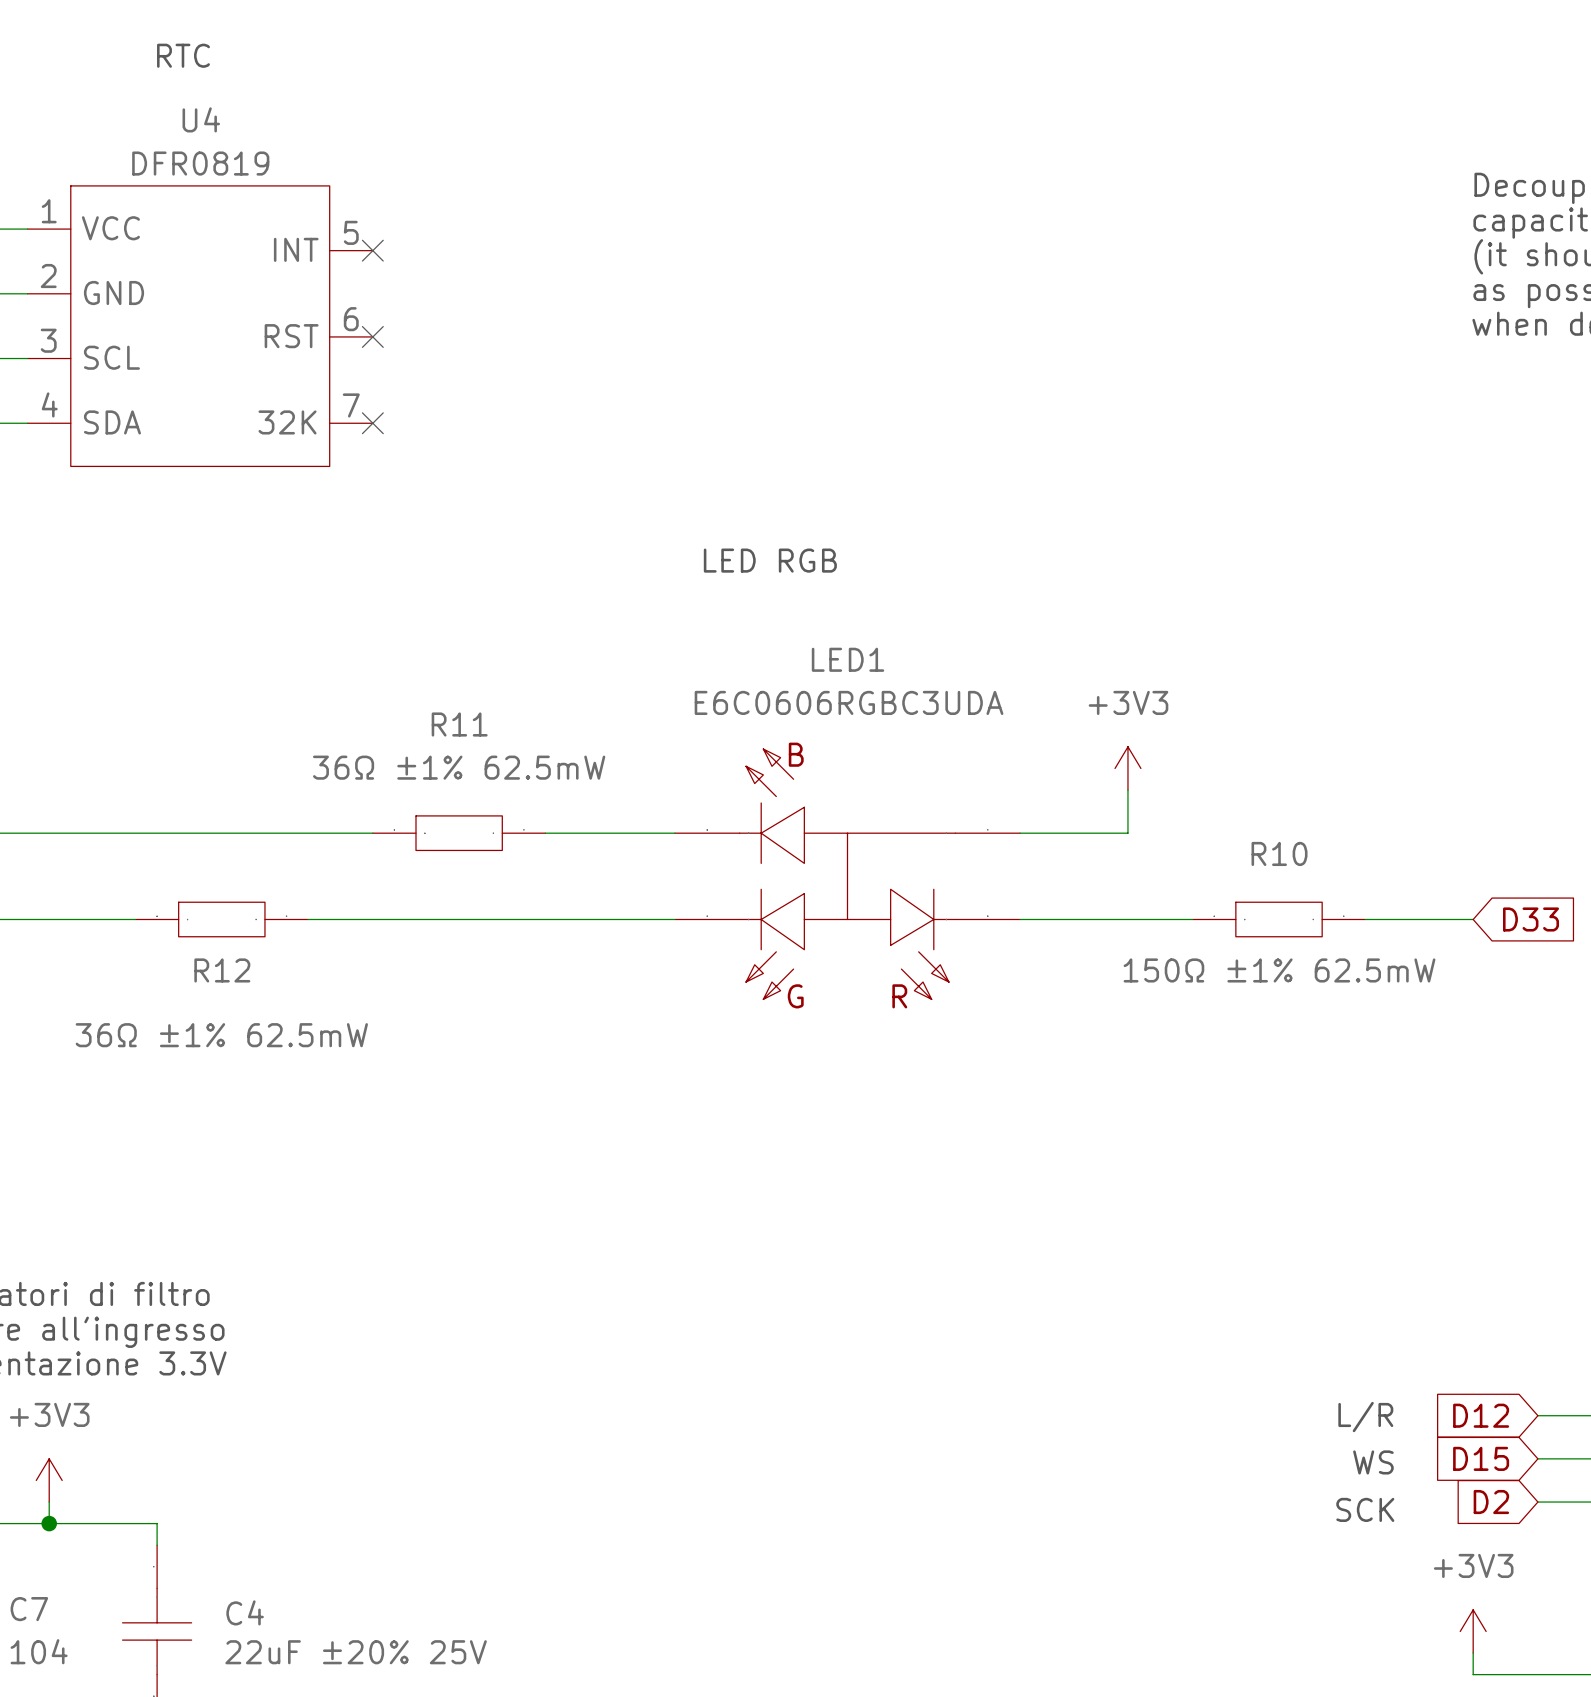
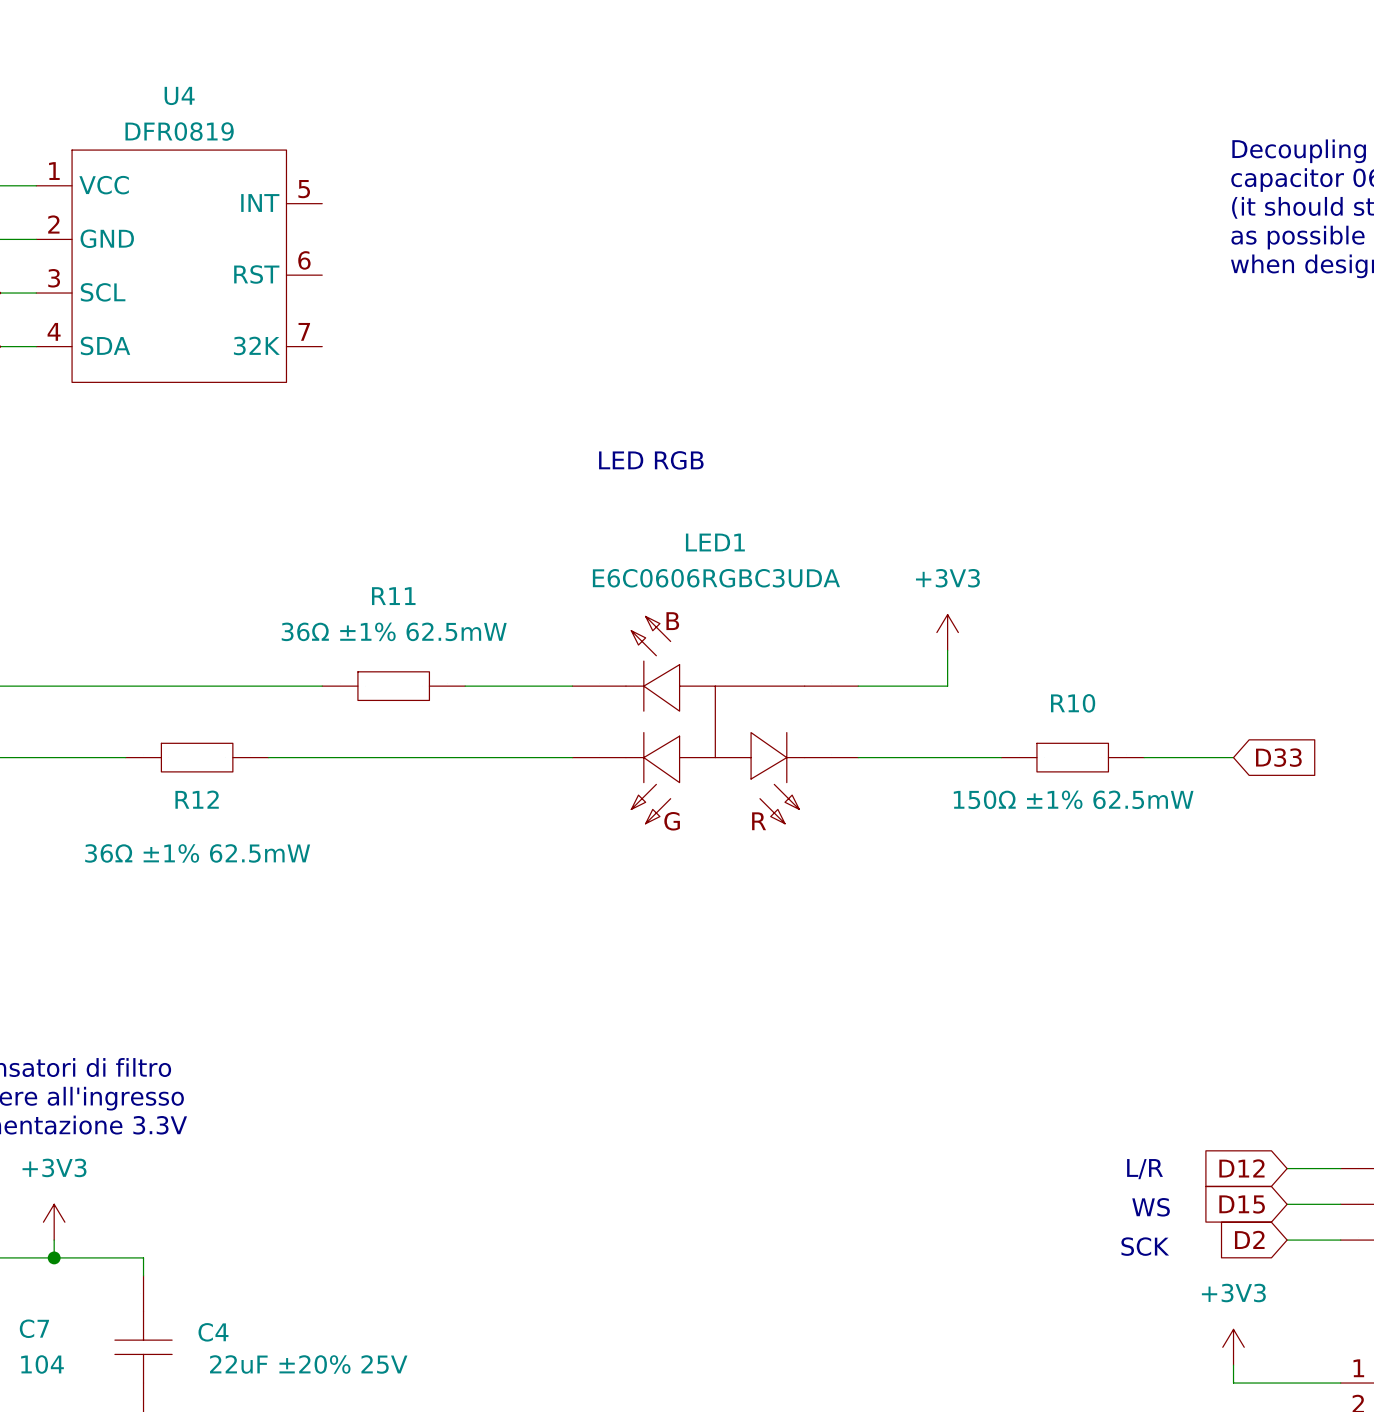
text: RTC (183, 55) -> none
no-connect mark: (372, 250) -> none
no-connect mark: (372, 336) -> none
no-connect mark: (372, 423) -> none

